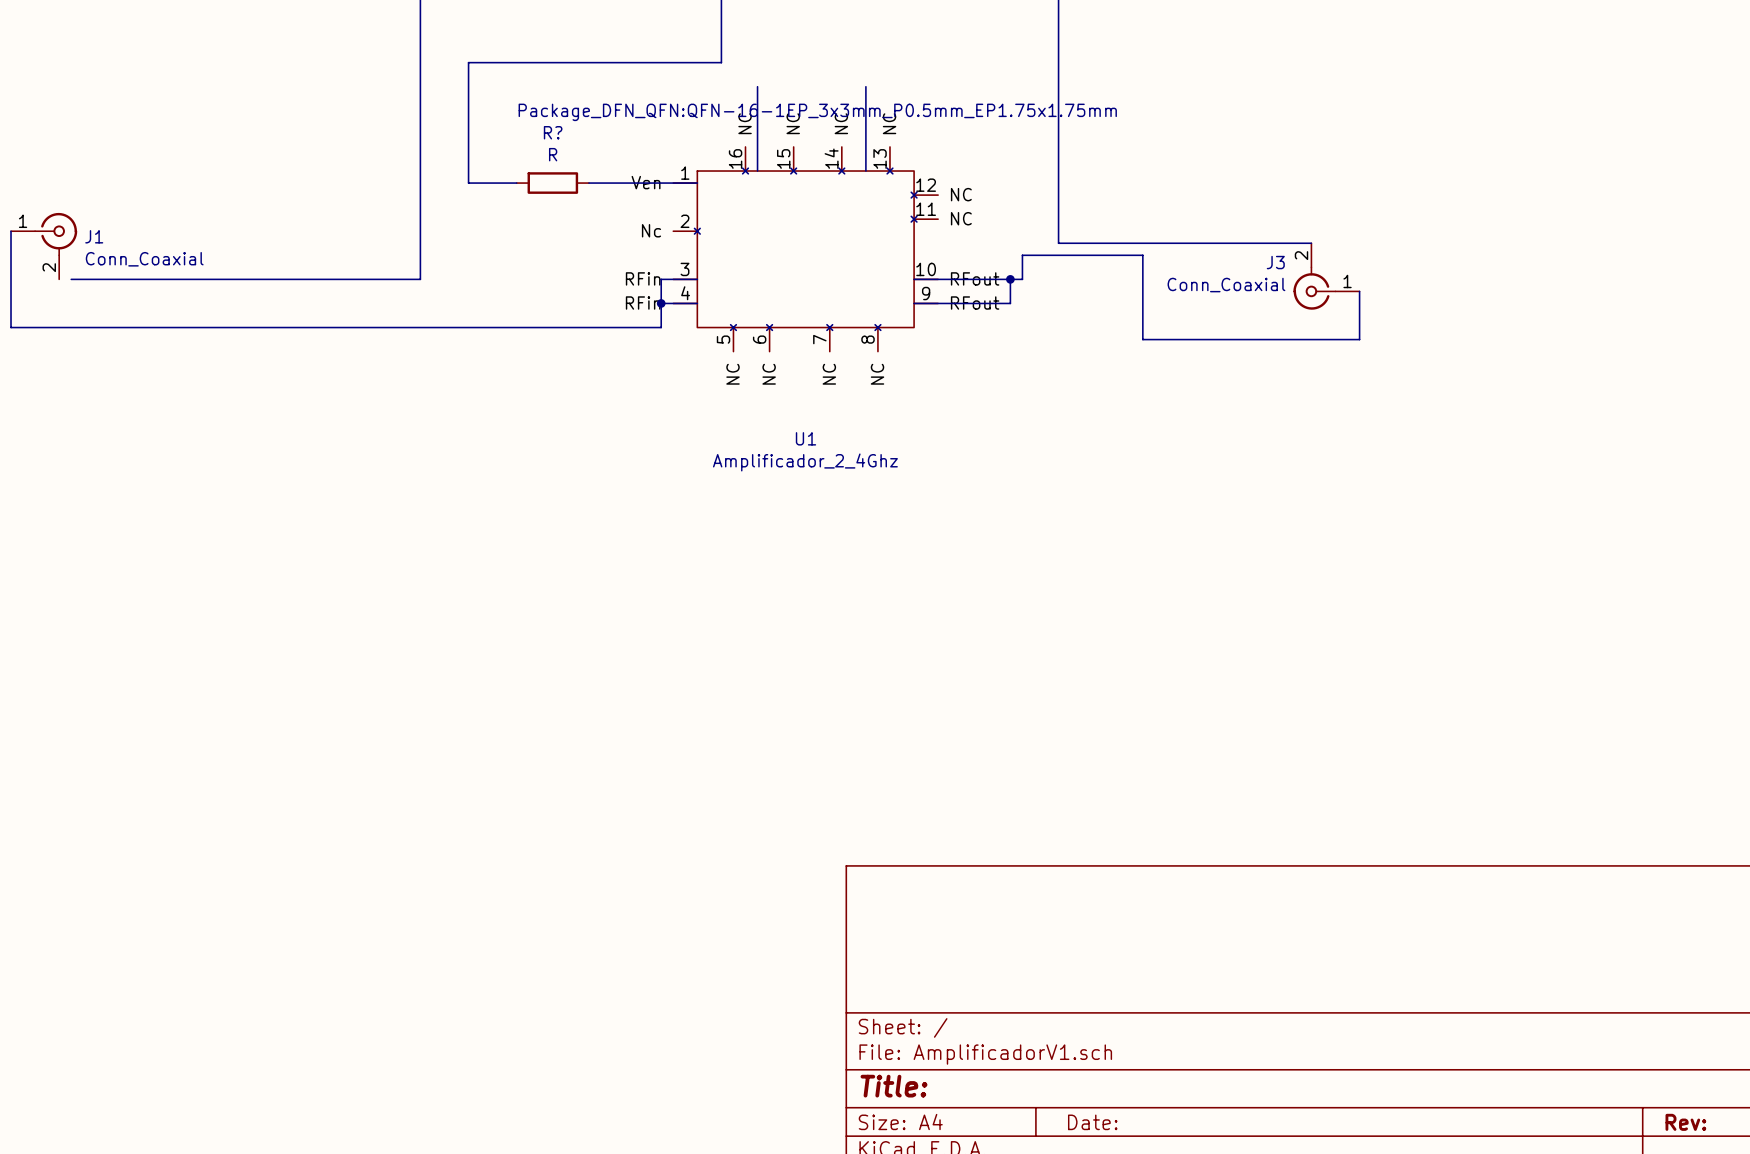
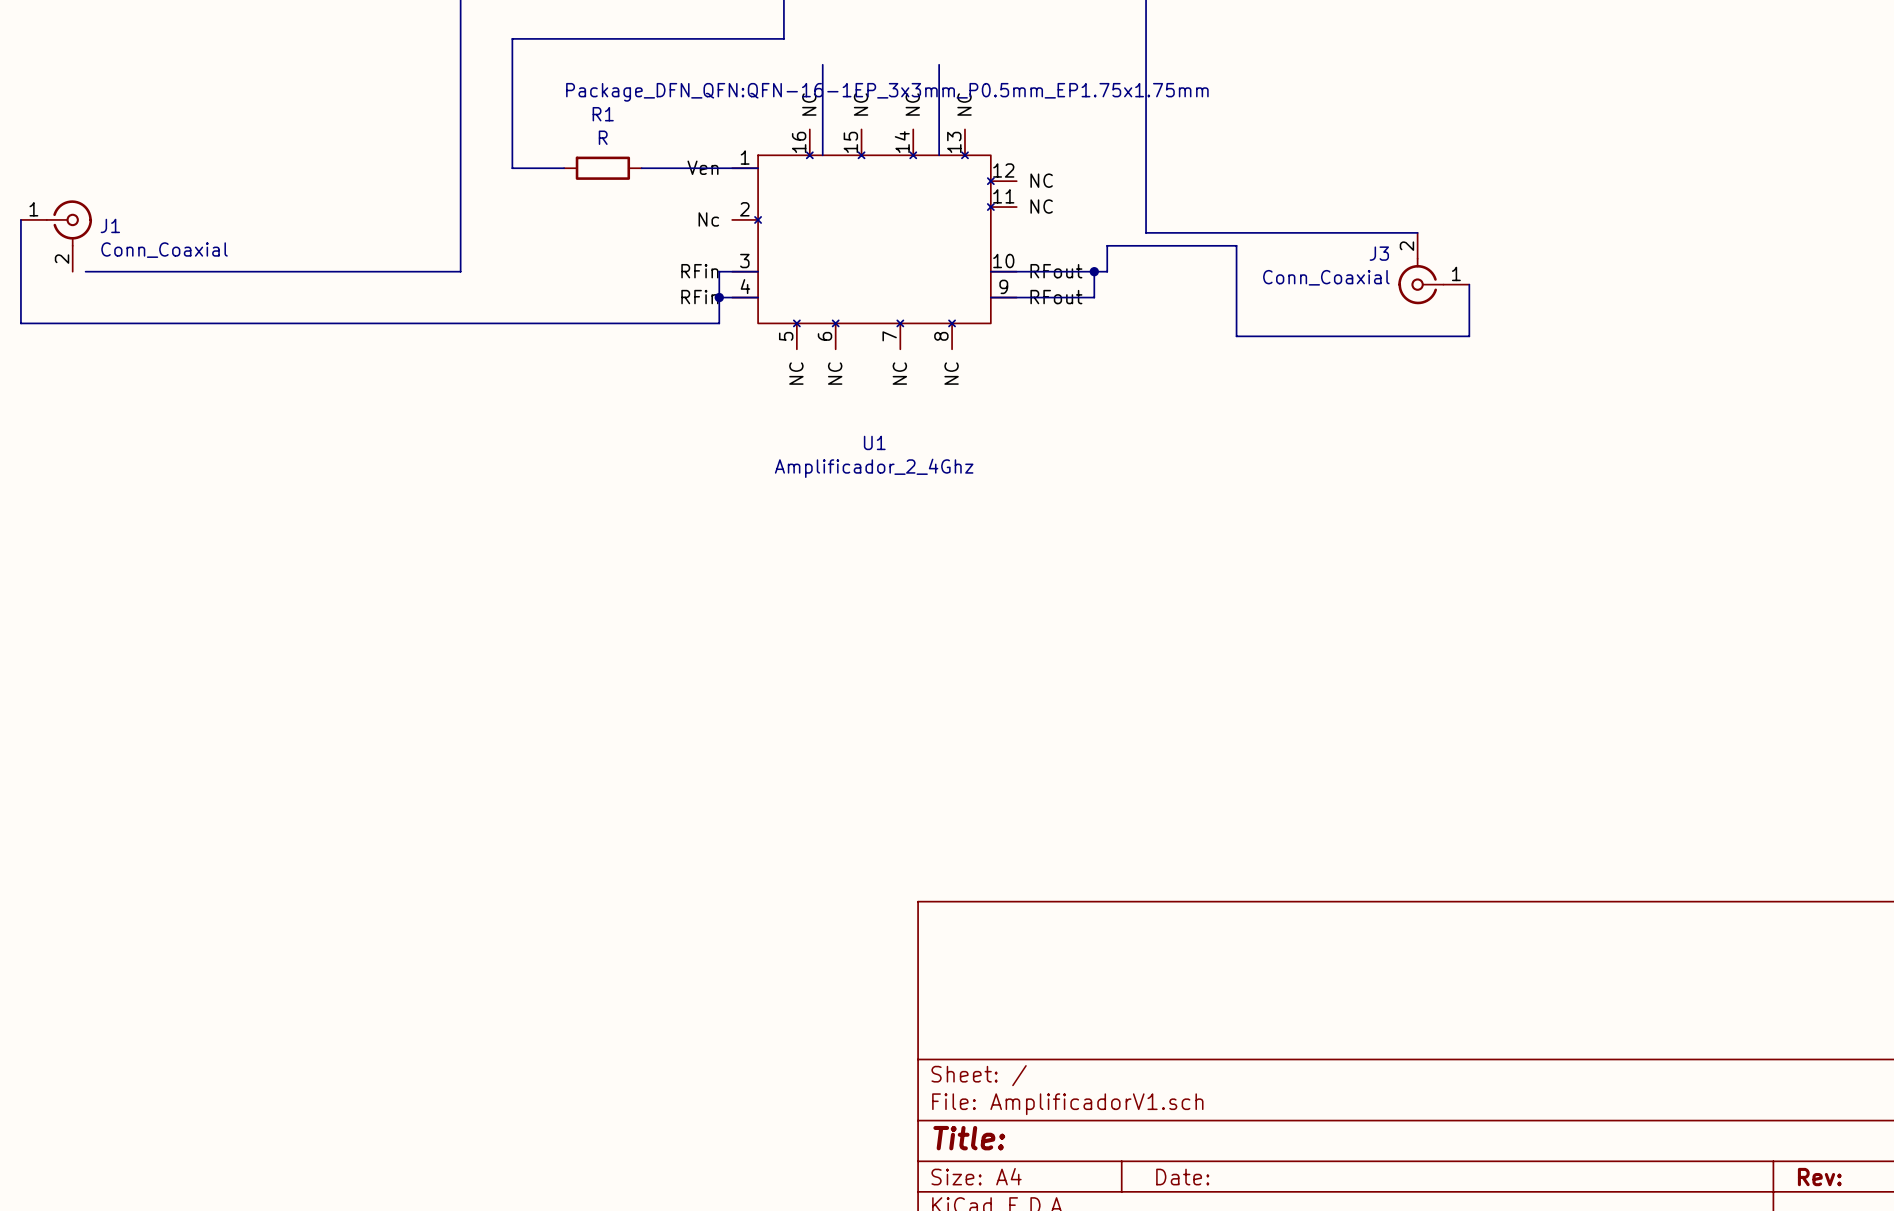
R? name: R? (553, 132) -> R1 (603, 114)

